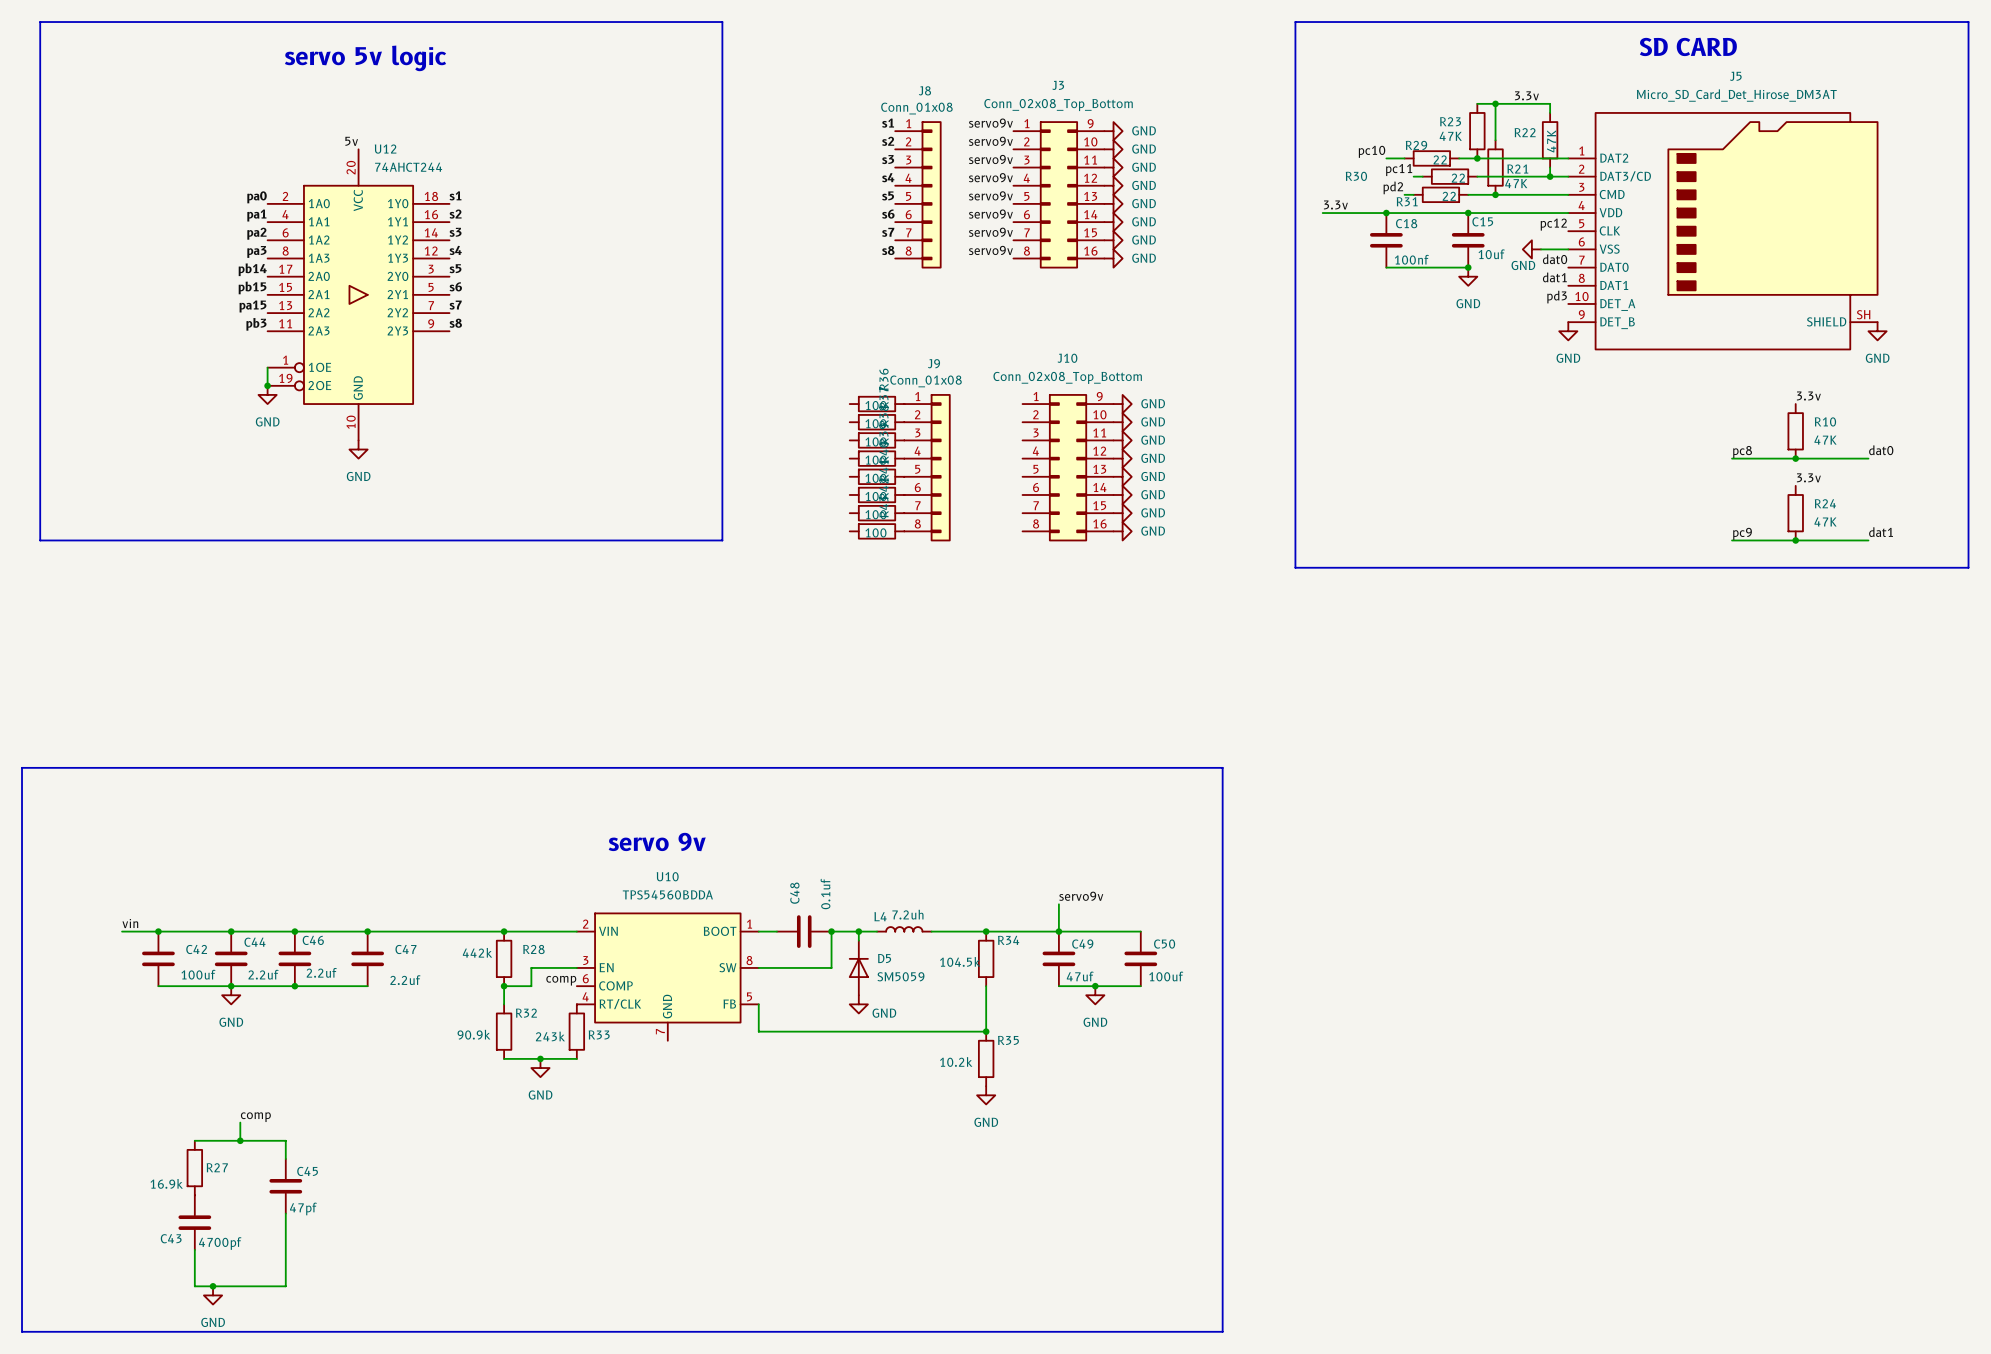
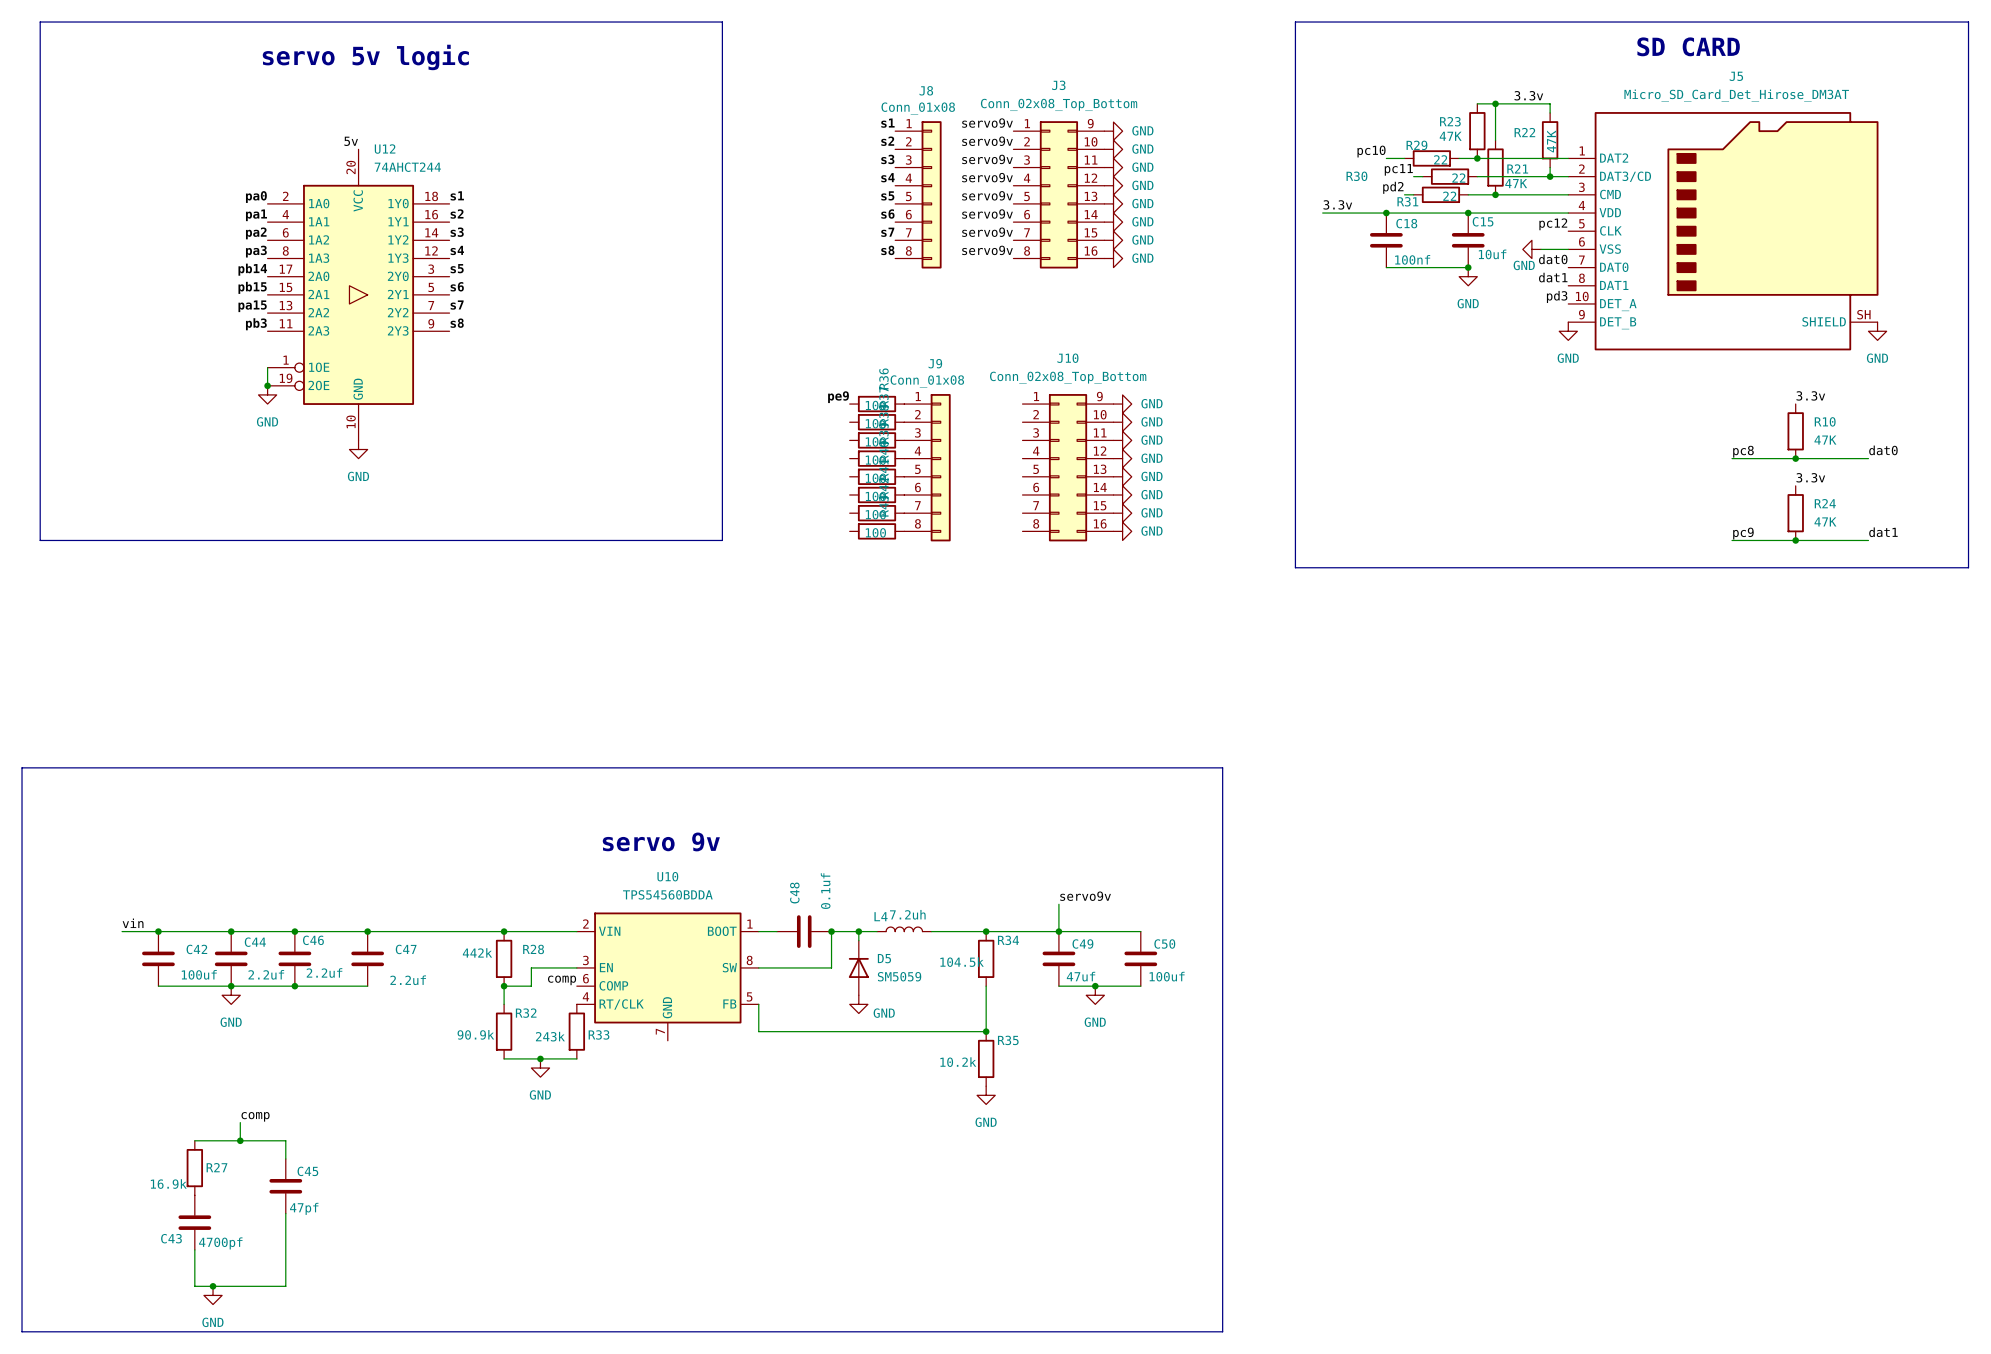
label: none -> pe9 (838, 397)

